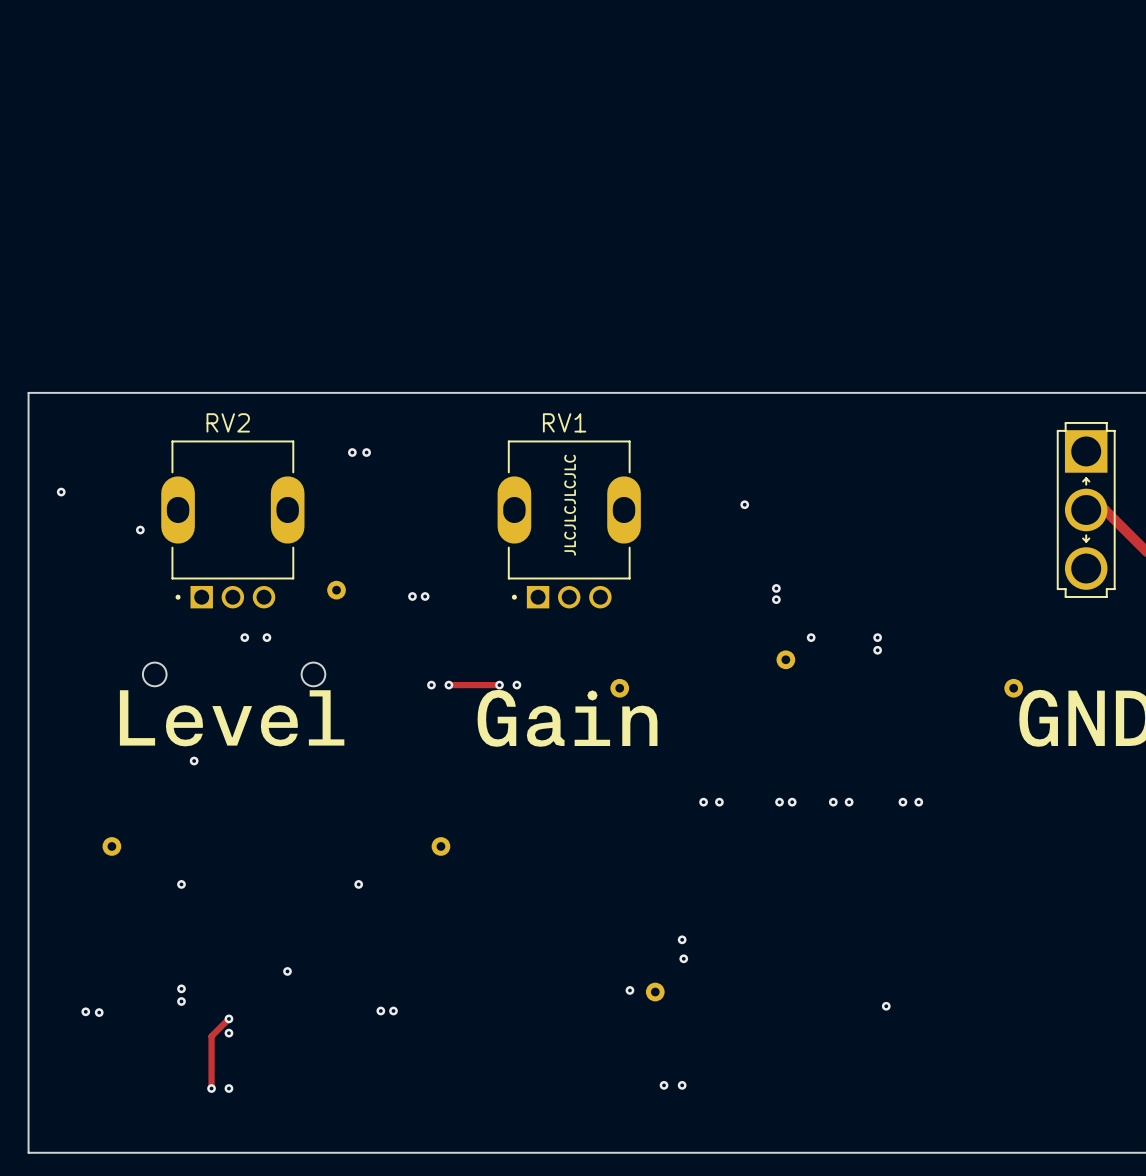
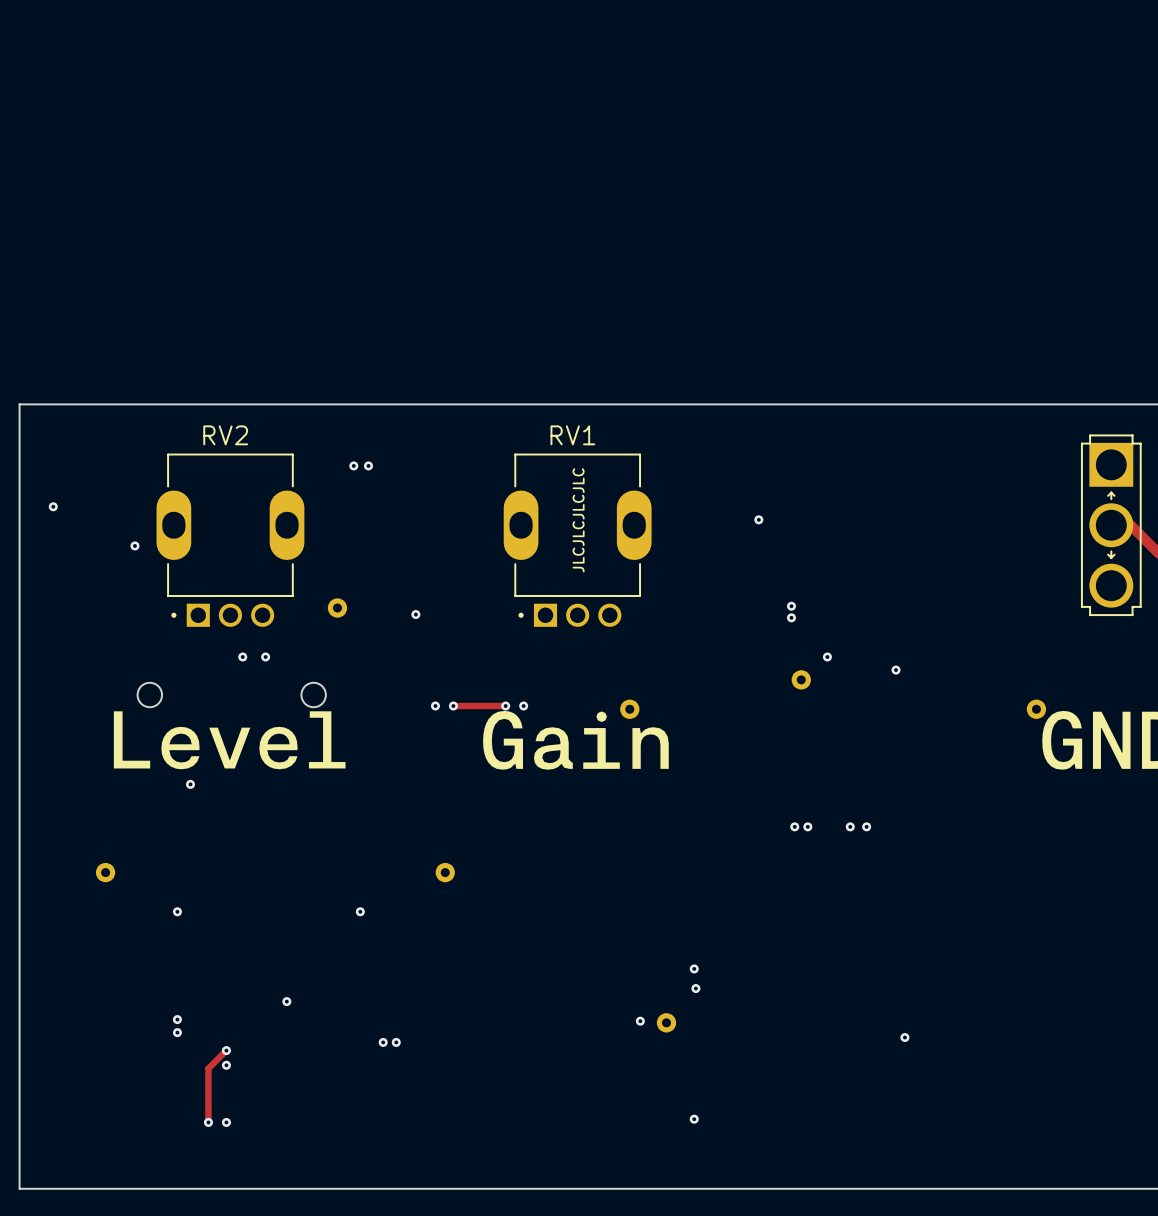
via: (425, 596) -> none
via: (877, 637) -> none
via: (703, 802) -> none
via: (719, 802) -> none
via: (902, 802) -> none
via: (918, 802) -> none
via: (85, 1011) -> none
via: (99, 1012) -> none
via: (664, 1085) -> none

